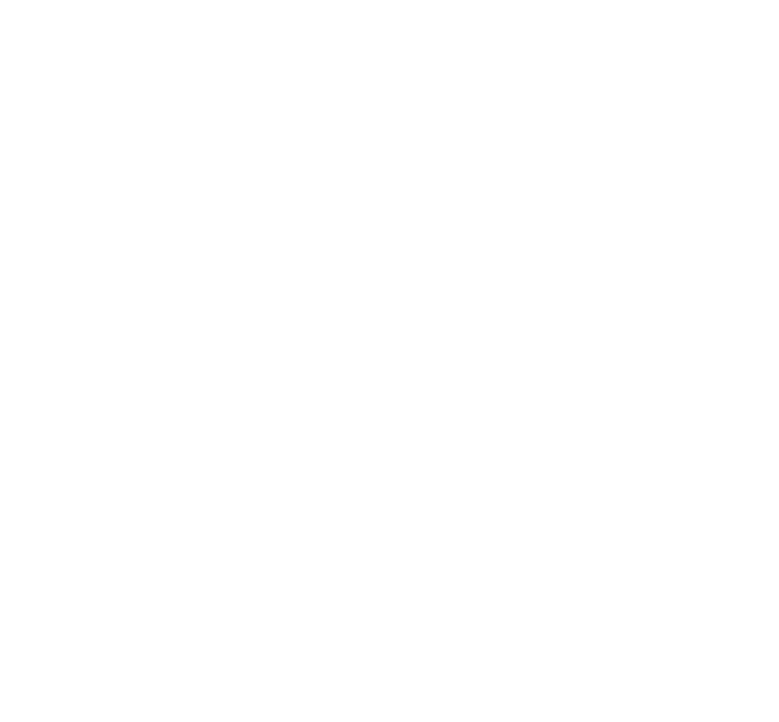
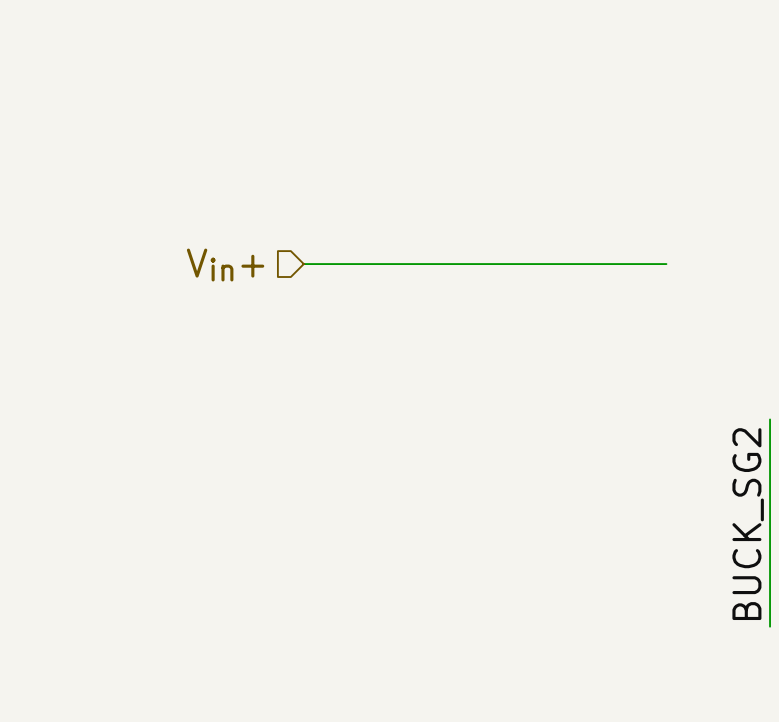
wire: none -> (303, 264) (666, 264)
hierarchical label: none -> Vin+ (225, 265)
wire: none -> (770, 419) (770, 626)
label: none -> BUCK_SG2 (748, 524)

